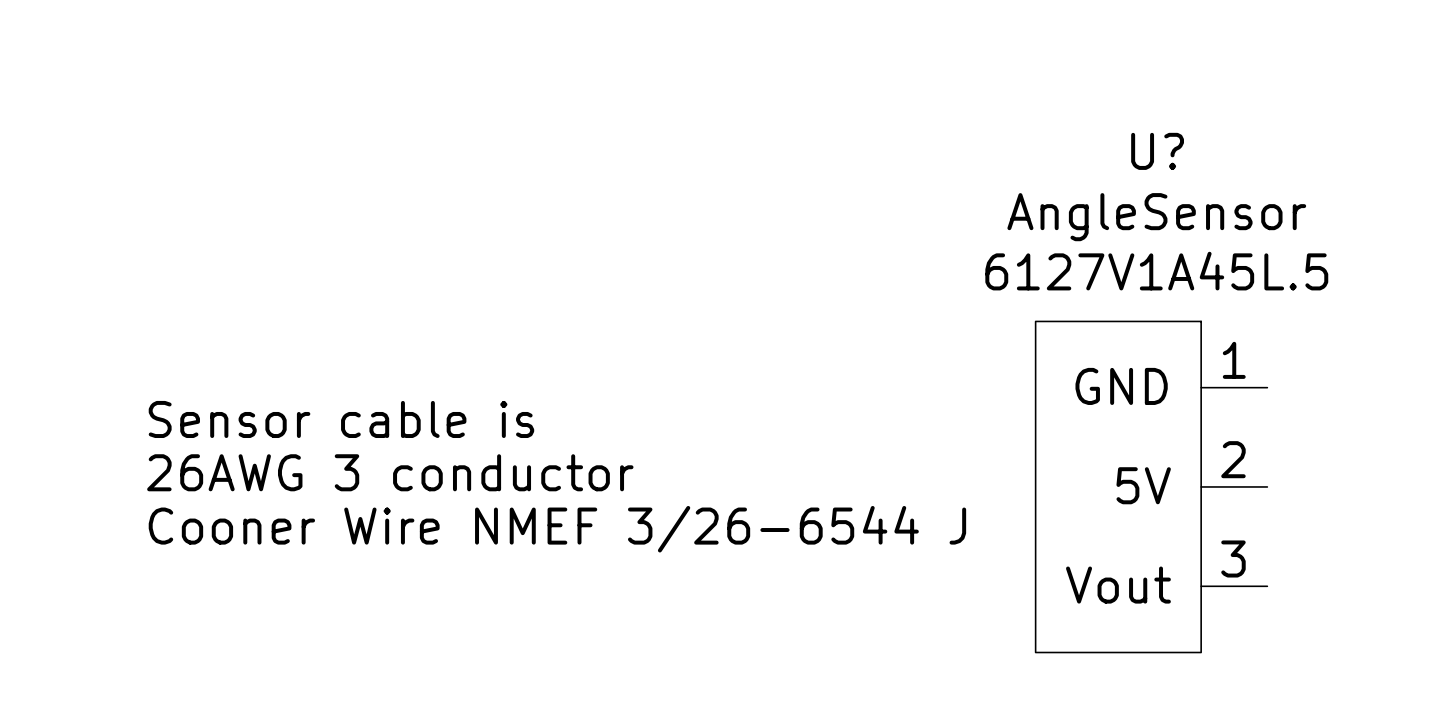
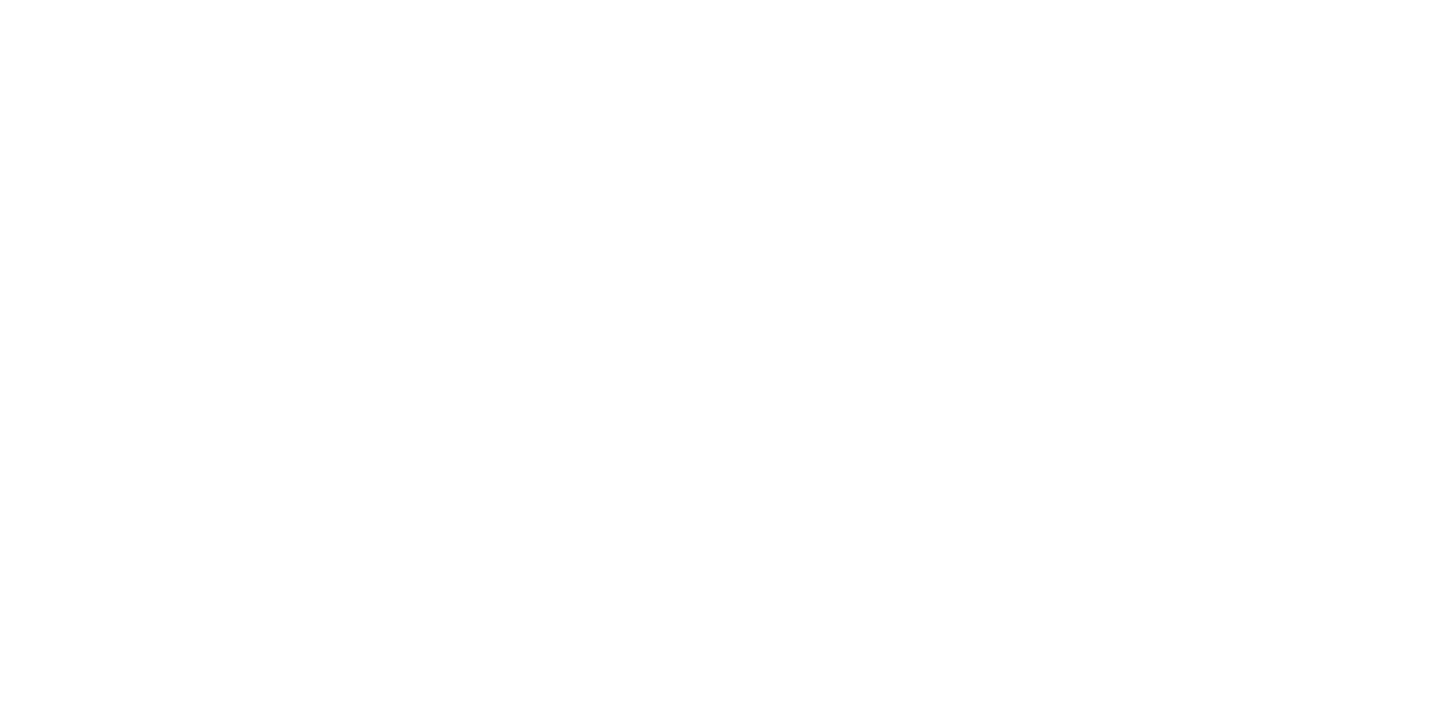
text: Sensor cable is (341, 419) -> none
text: 26AWG 3 conductor (390, 472) -> none
U?: AngleSensor (1151, 486) -> none
text: Cooner Wire NMEF 3/26-6544 J (557, 529) -> none

